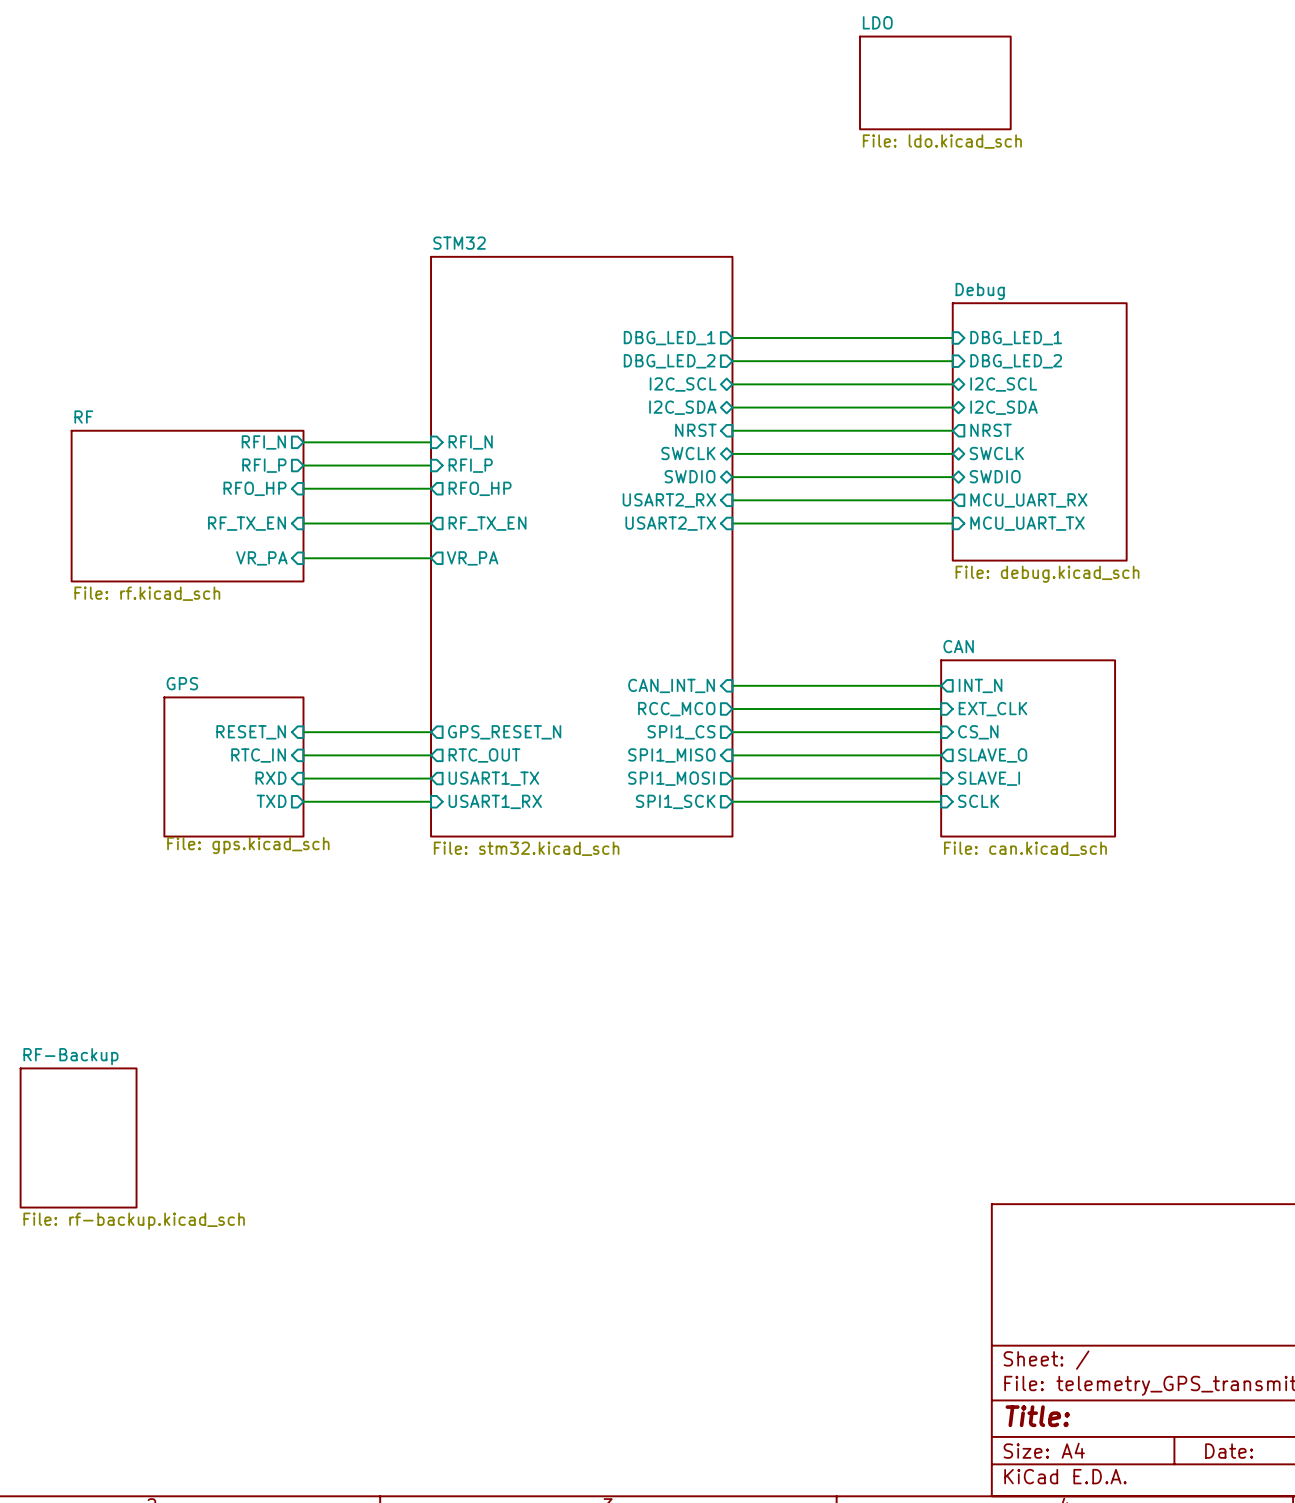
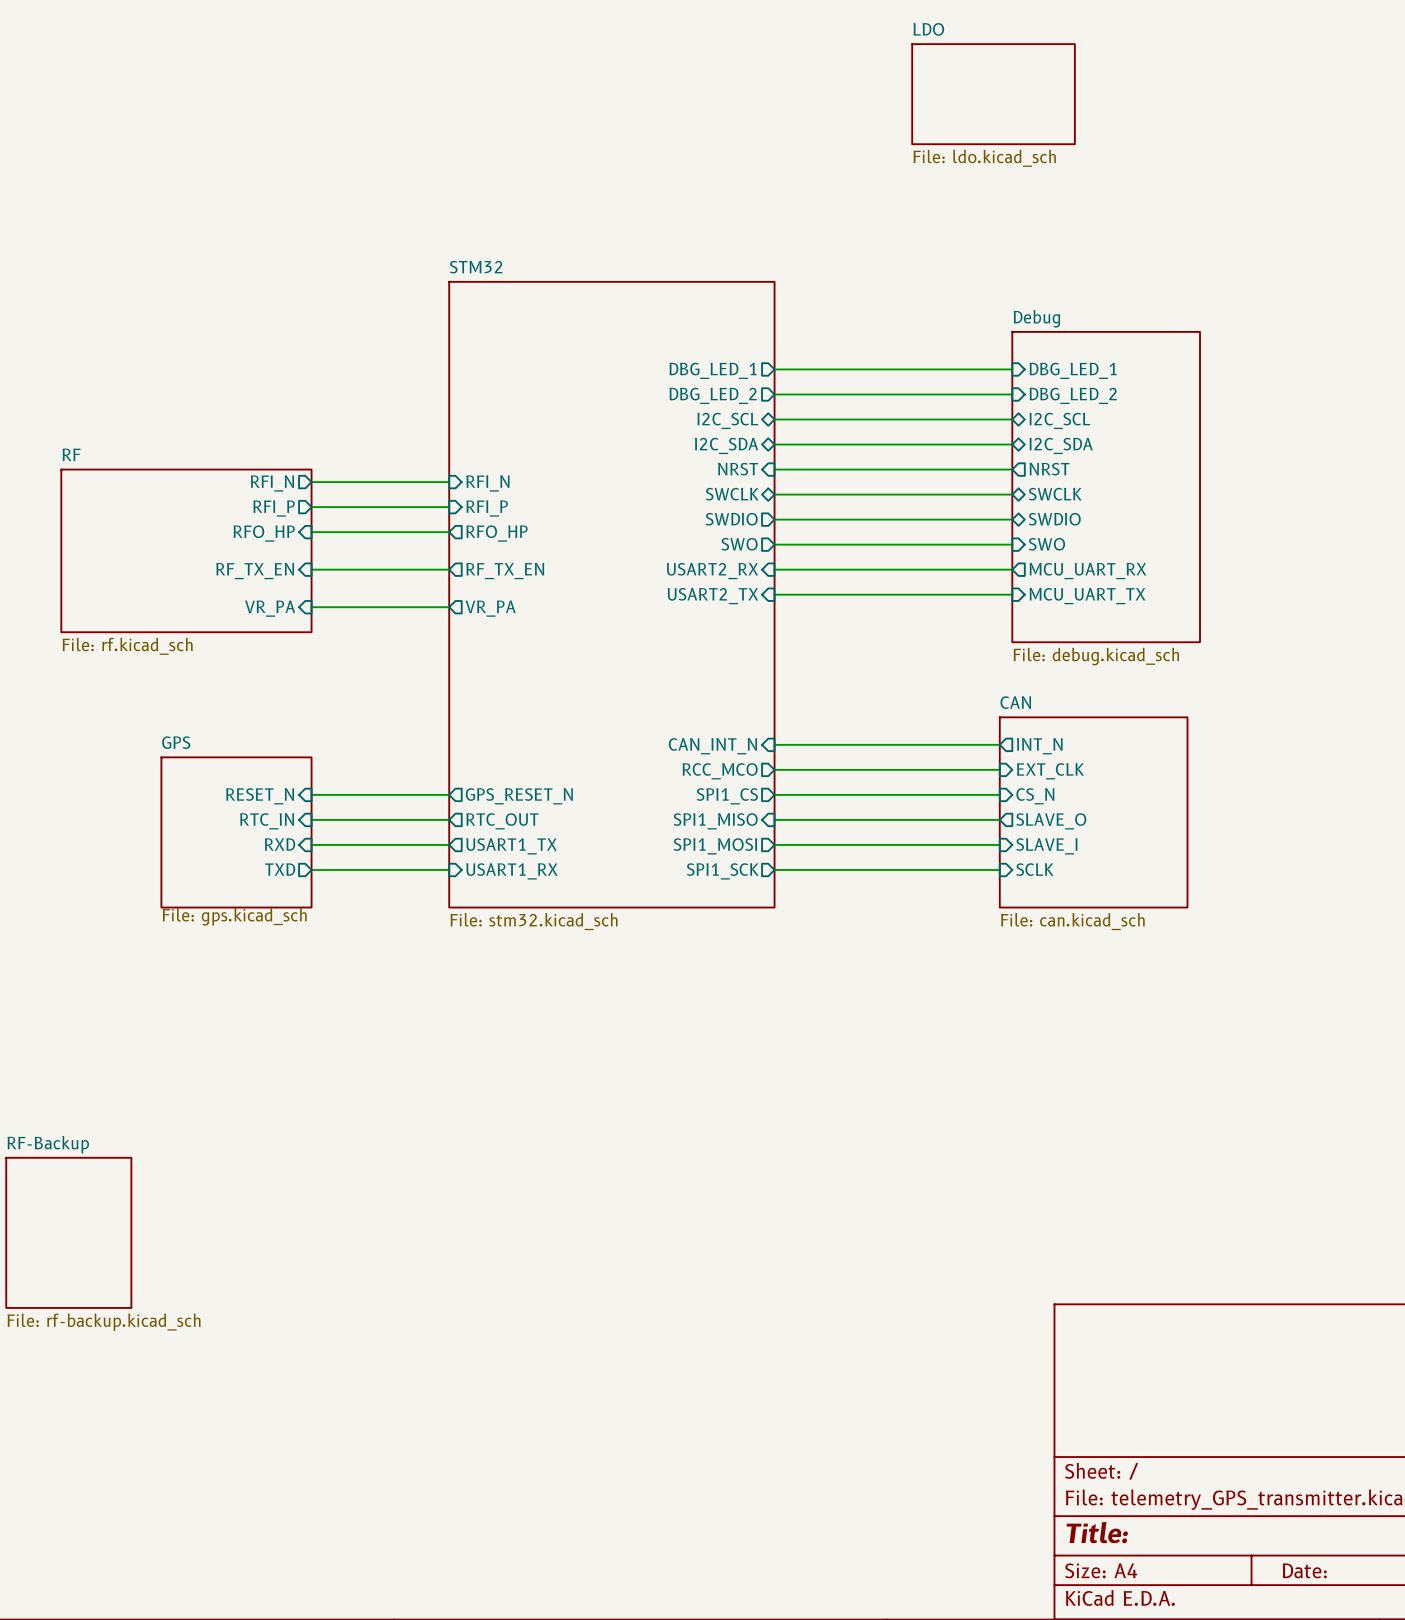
sheet Debug: File: debug.kicad_sch (1039, 431) -> none
sheet Debug: none -> File: debug.kicad_sch (1106, 487)
sheet pin shape: bidirectional (690, 476) -> output (731, 519)
sheet pin shape: input (669, 500) -> output (739, 544)
sheet pin: USART2_RX (669, 500) -> SWO (739, 544)
sheet pin shape: output (1028, 500) -> input (1046, 544)
sheet pin: MCU_UART_RX (1028, 500) -> SWO (1046, 544)
sheet pin: USART2_TX (670, 523) -> USART2_RX (712, 571)
sheet pin shape: input (1027, 523) -> output (1087, 571)
sheet pin: MCU_UART_TX (1027, 523) -> MCU_UART_RX (1087, 571)
sheet pin: none -> USART2_TX (712, 596)
wire: none -> (774, 594) (1012, 594)
sheet pin: none -> MCU_UART_TX (1087, 596)

